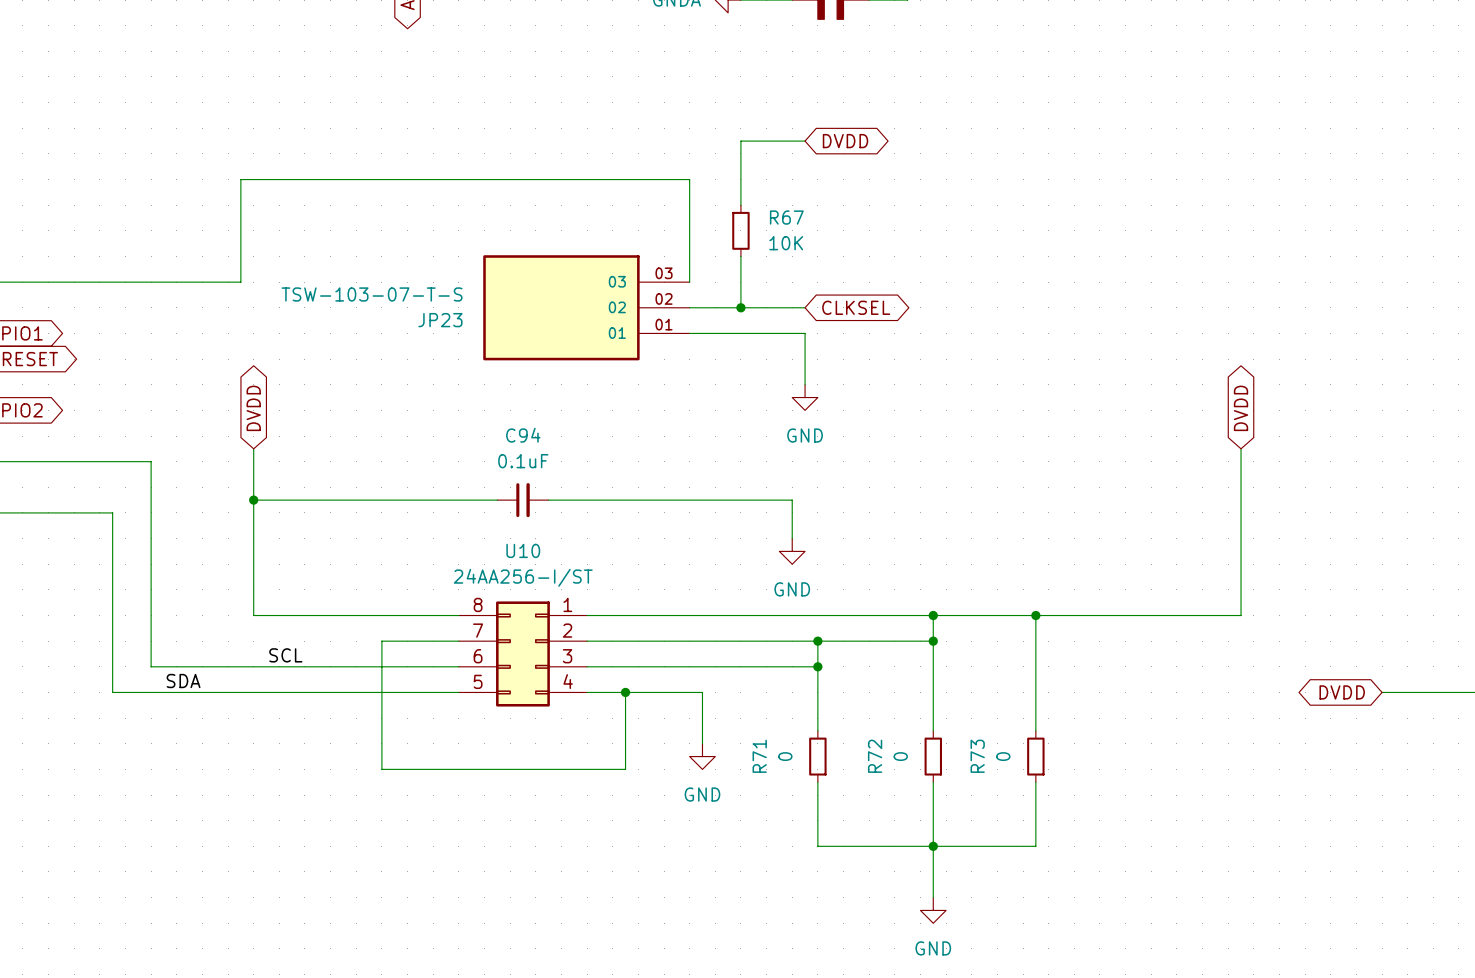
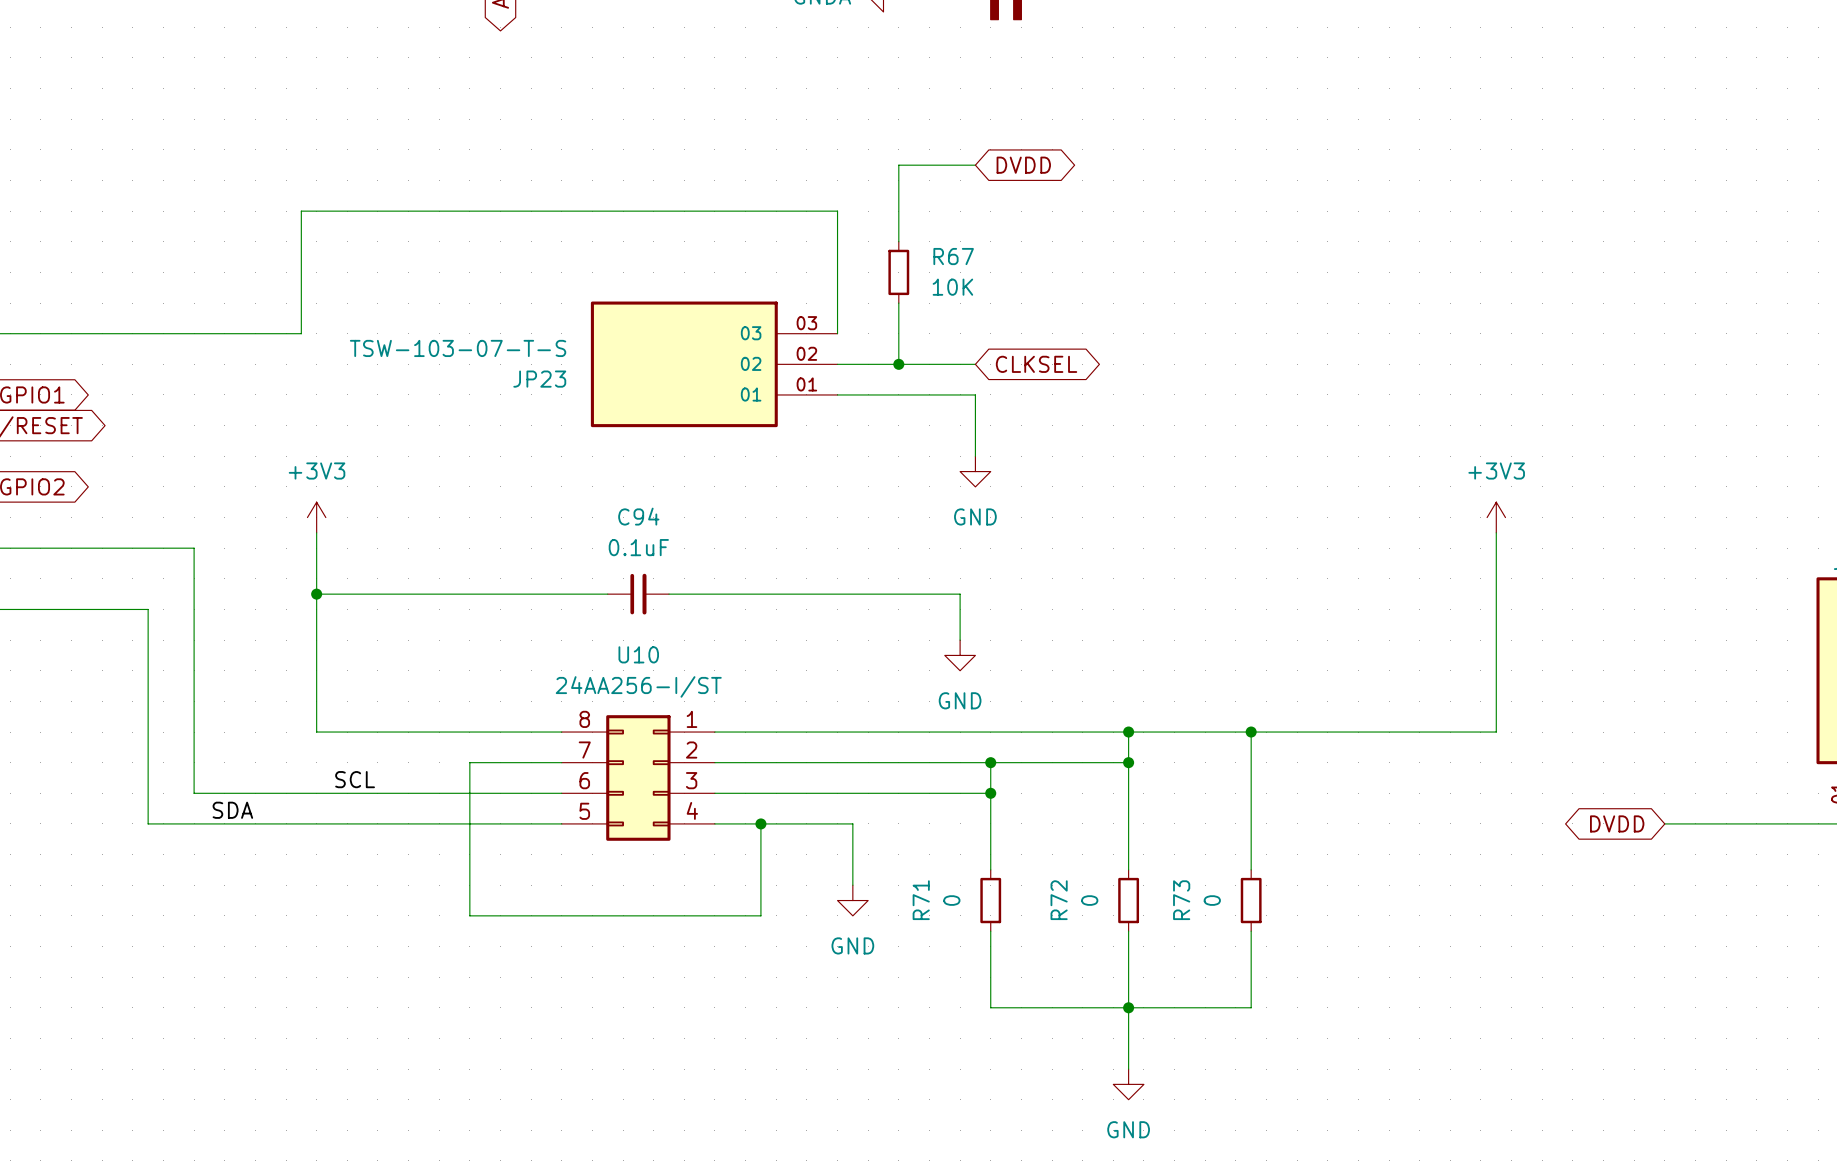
global label: DVDD (253, 408) -> none
global label: DVDD (1241, 408) -> none
power symbol: none -> +3V3 (316, 517)
power symbol: none -> +3V3 (1496, 517)

